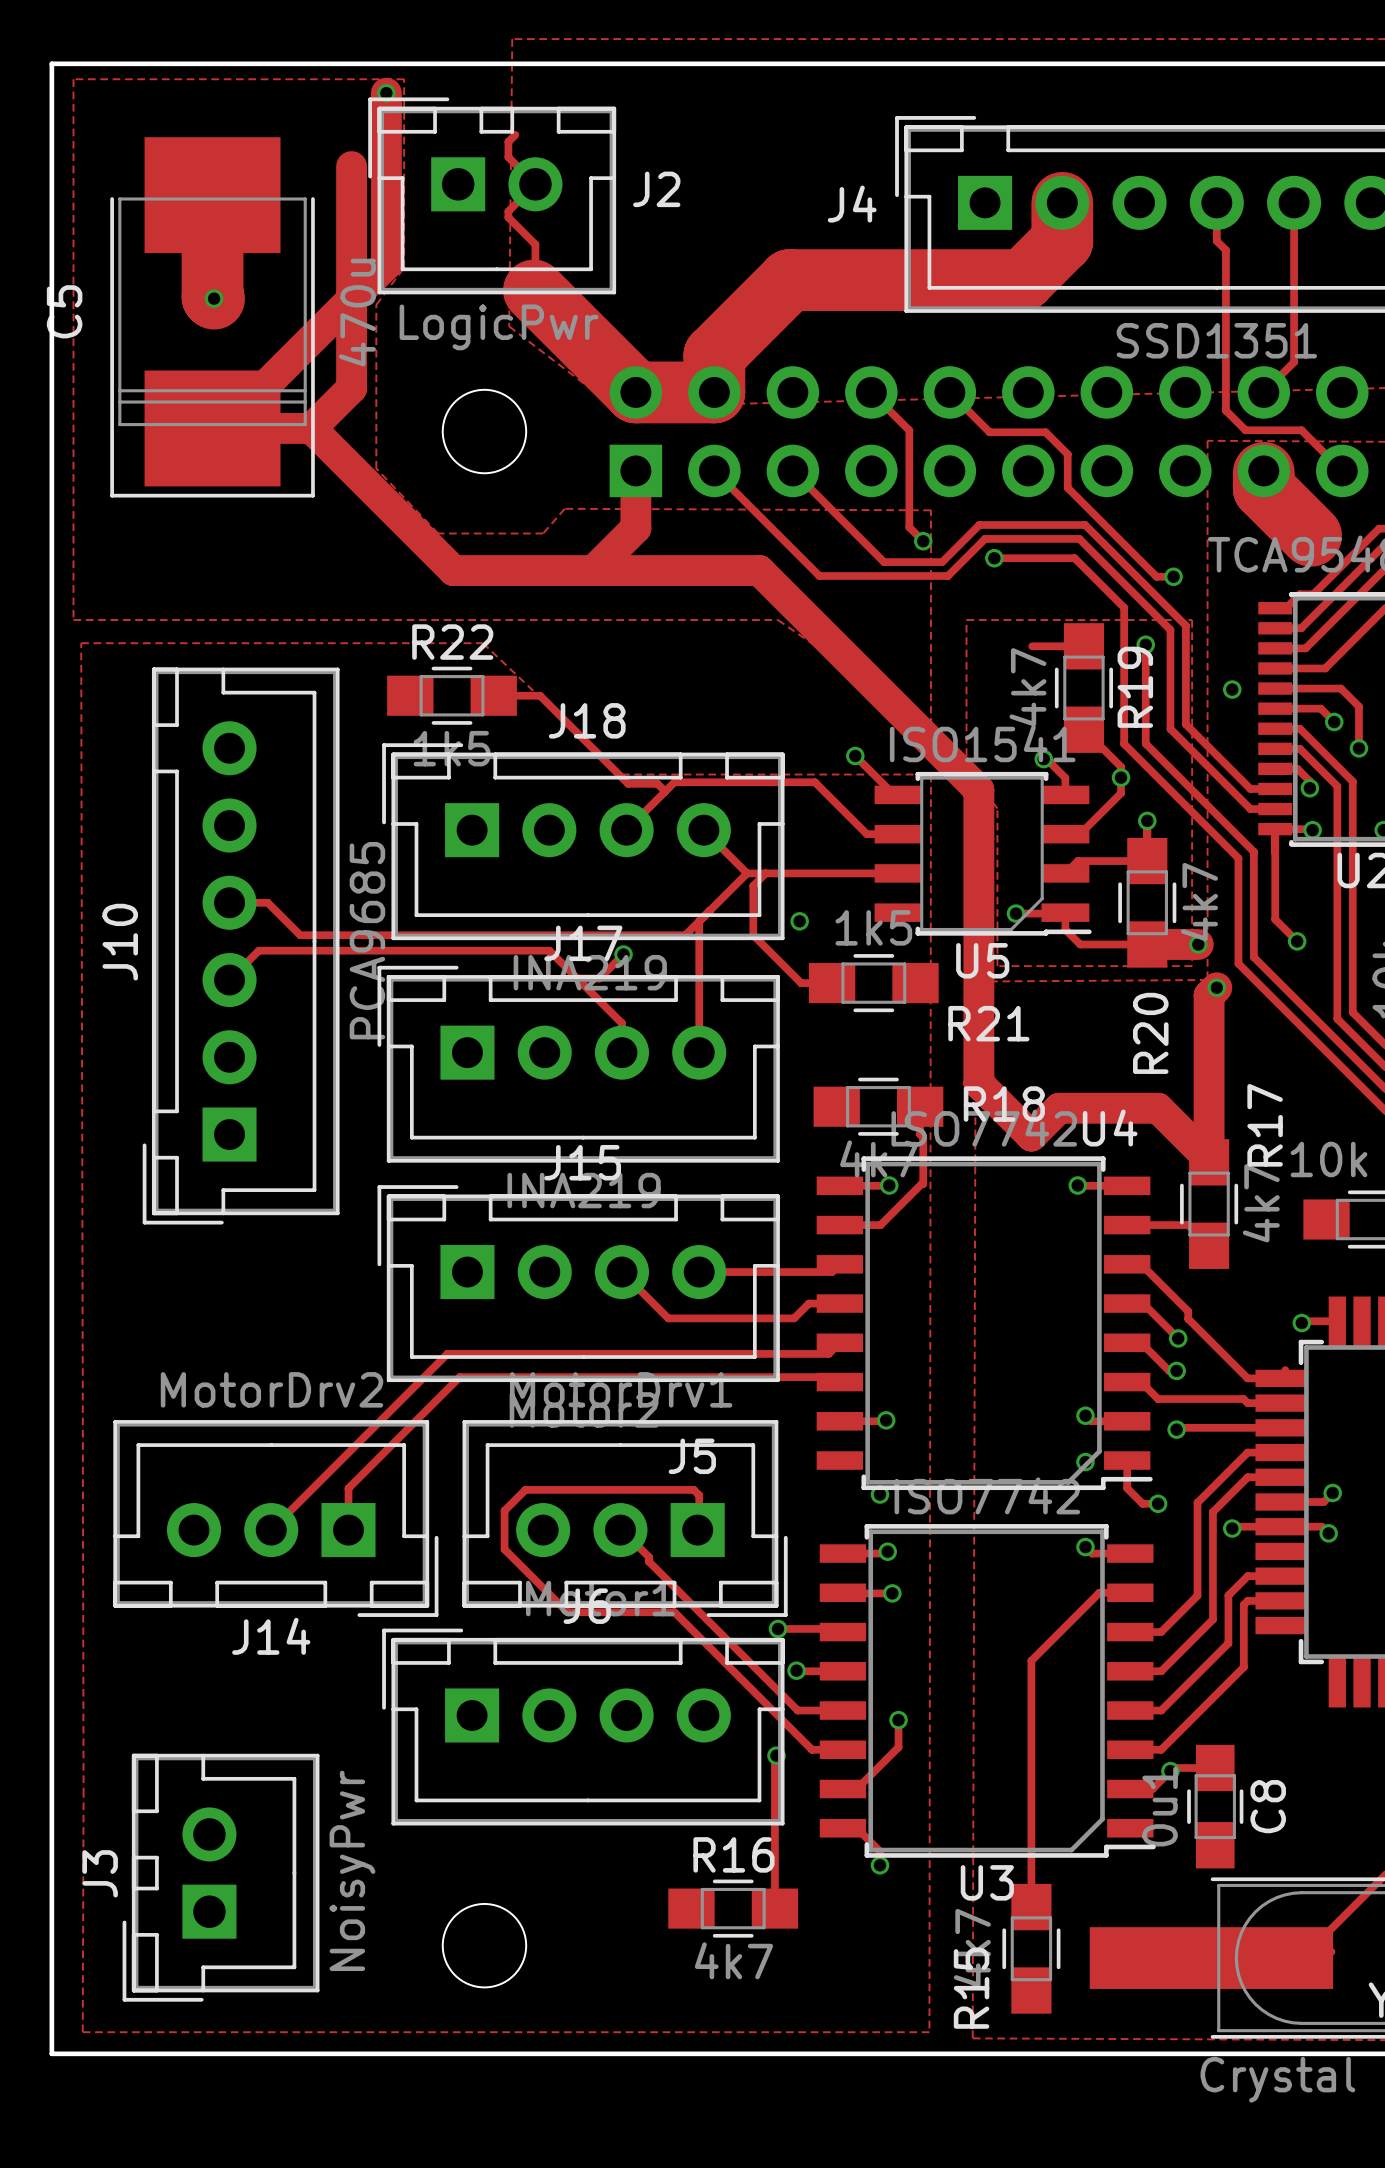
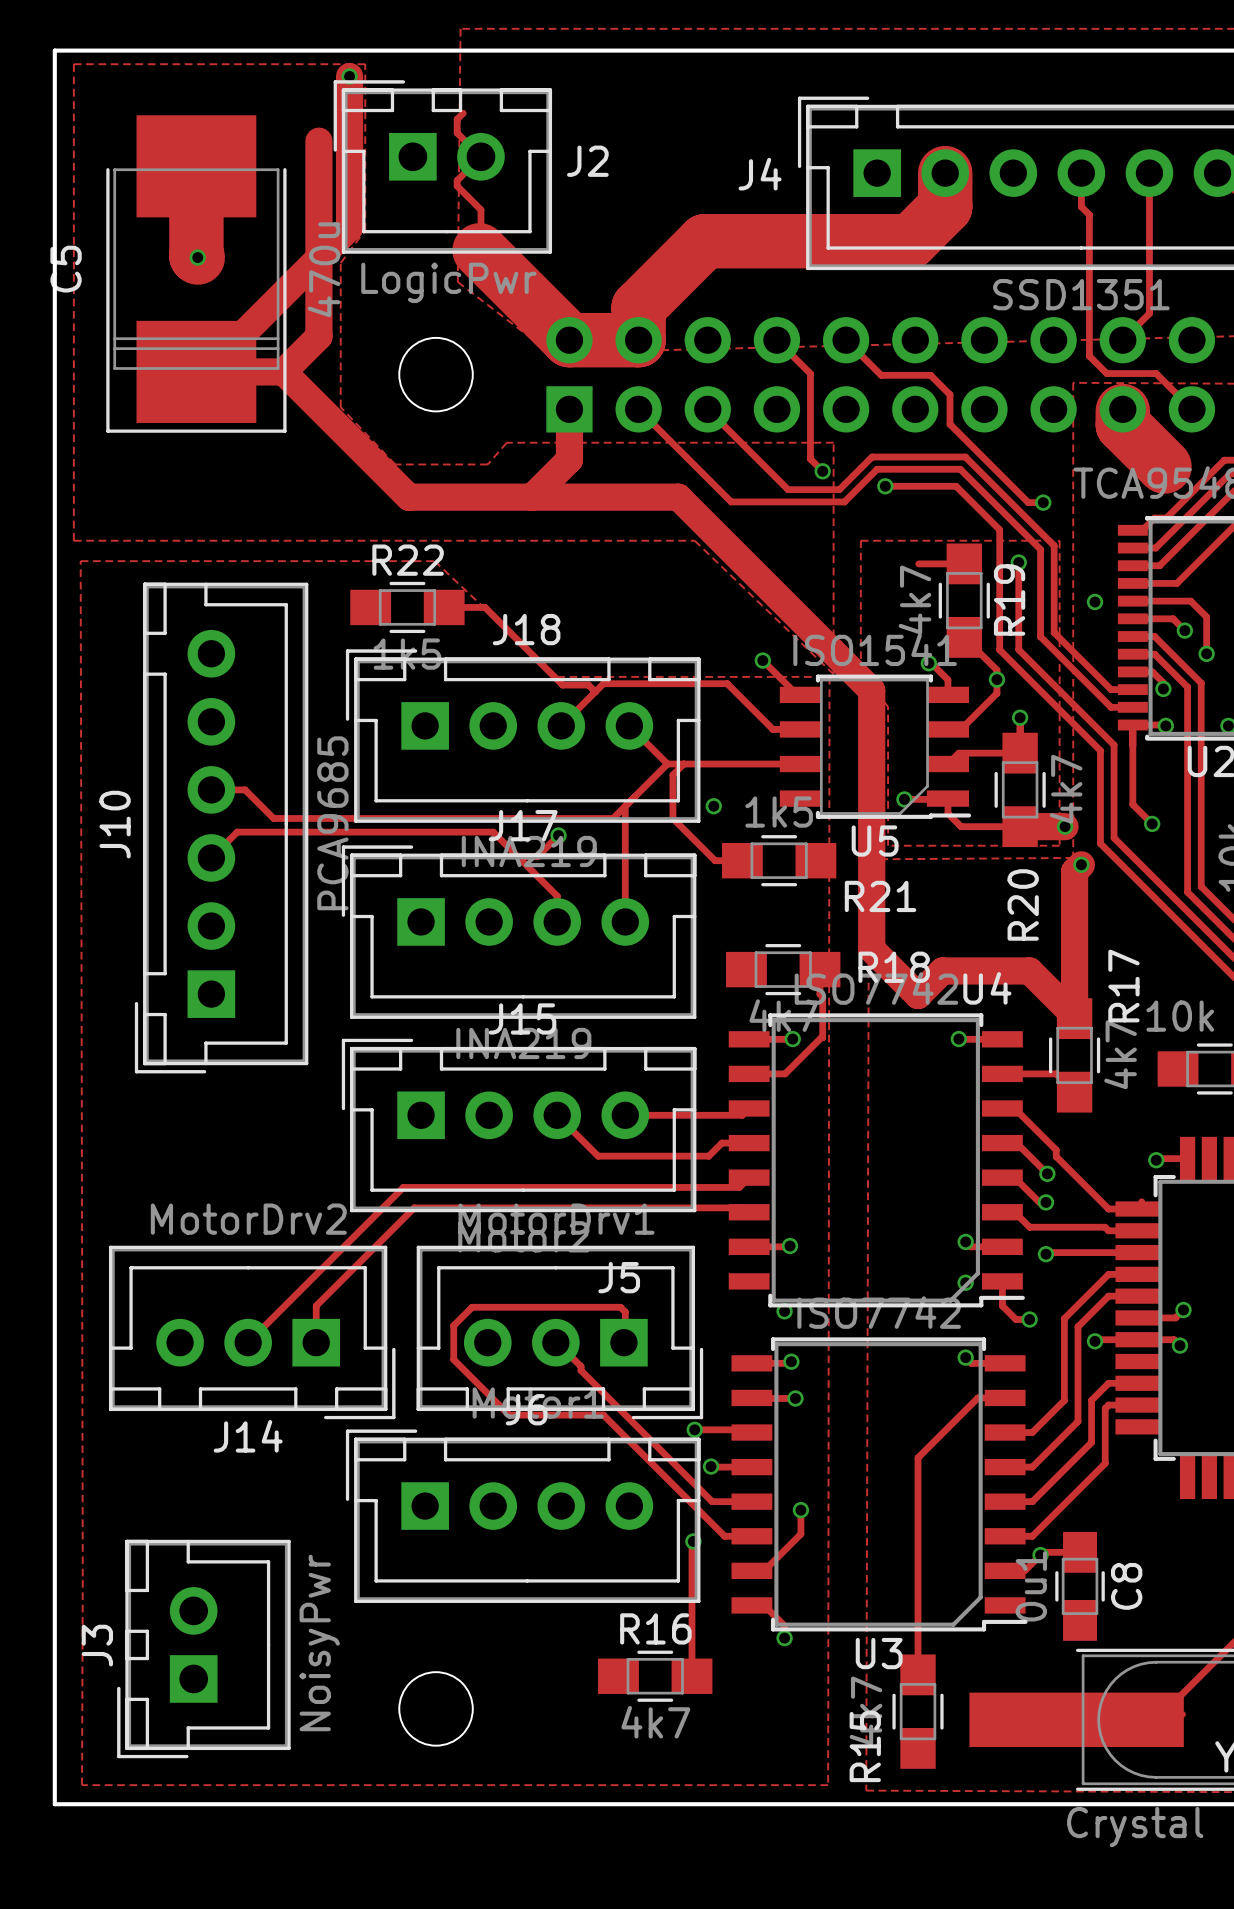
zone outline: (564, 508) (930, 510) (930, 725) (778, 620) -> (506, 442) (833, 442) (833, 674) (694, 540)

